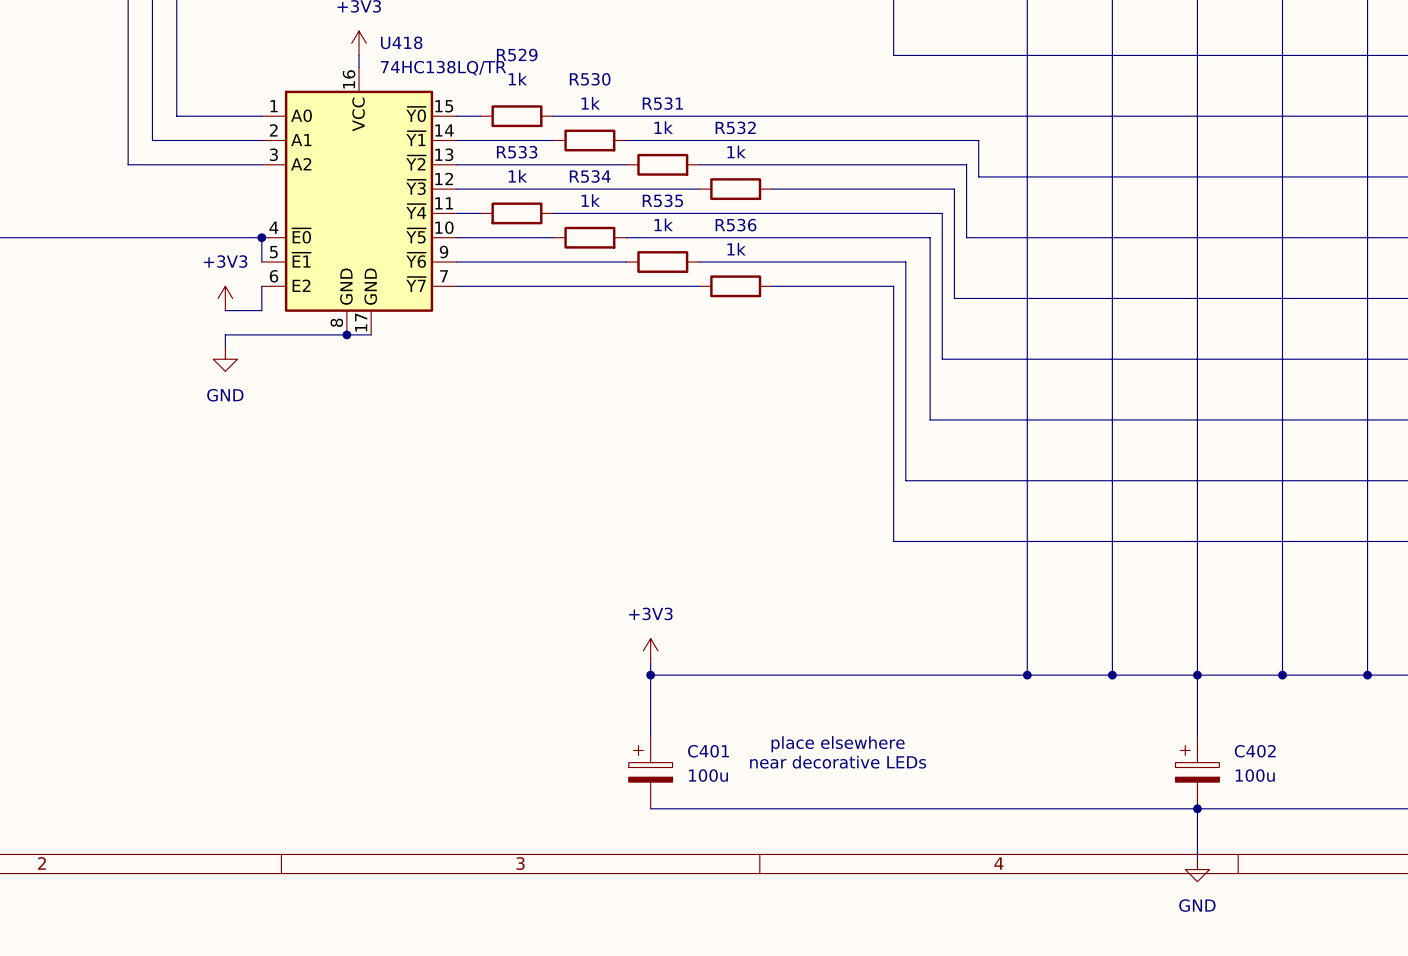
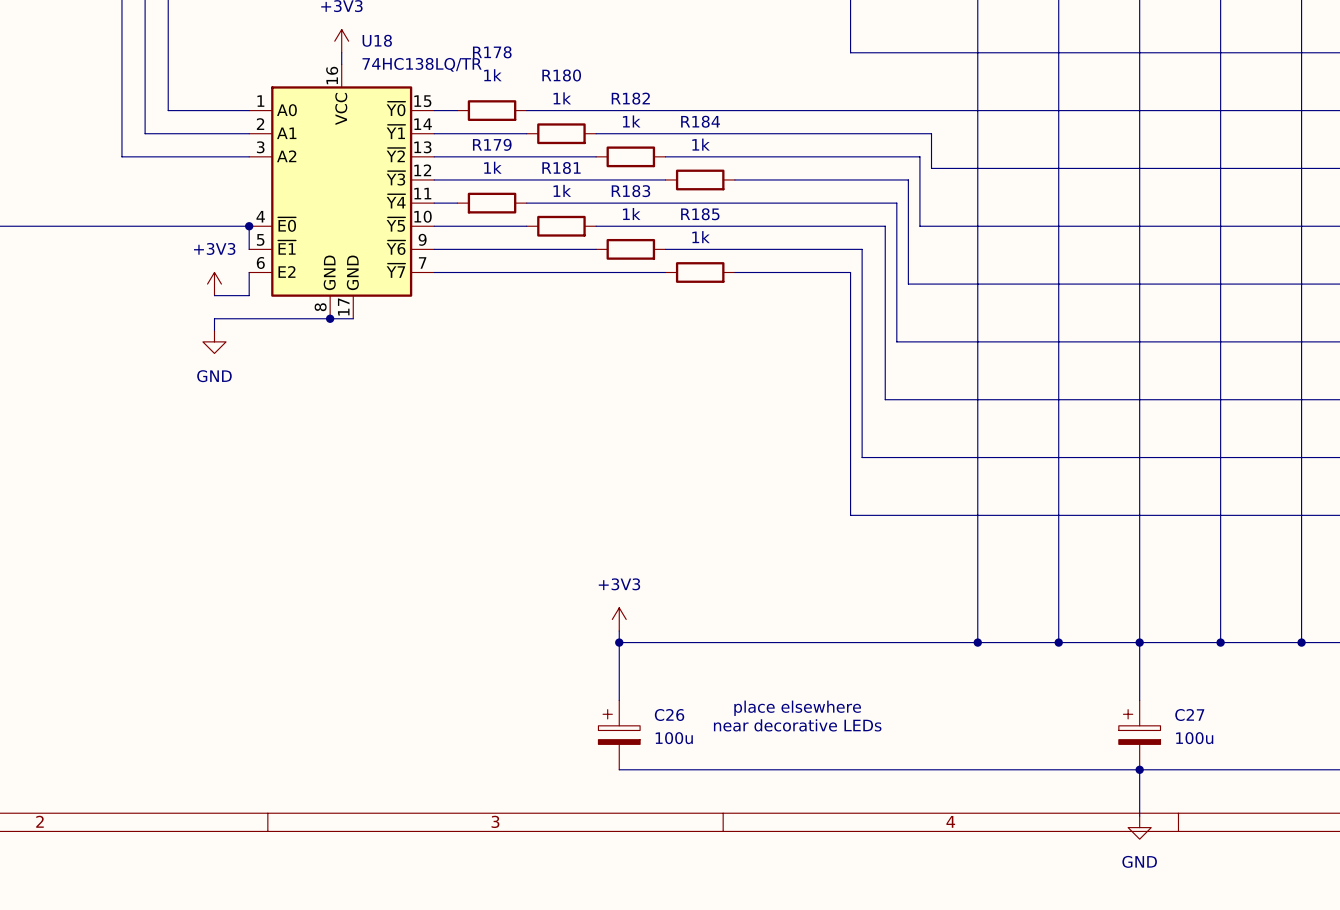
U418 name: U418 (401, 42) -> U18 (377, 40)
R529 name: R529 (517, 55) -> R178 (492, 52)
R530 name: R530 (590, 79) -> R180 (561, 75)
R531 name: R531 (662, 103) -> R182 (630, 98)
R532 name: R532 (735, 127) -> R184 (700, 121)
R533 name: R533 (517, 152) -> R179 (492, 144)
R534 name: R534 (590, 176) -> R181 (561, 167)
R535 name: R535 (662, 200) -> R183 (630, 191)
R536 name: R536 (735, 225) -> R185 (700, 214)
C401 name: C401 (708, 751) -> C26 (669, 715)
C402 name: C402 (1255, 751) -> C27 (1189, 715)

